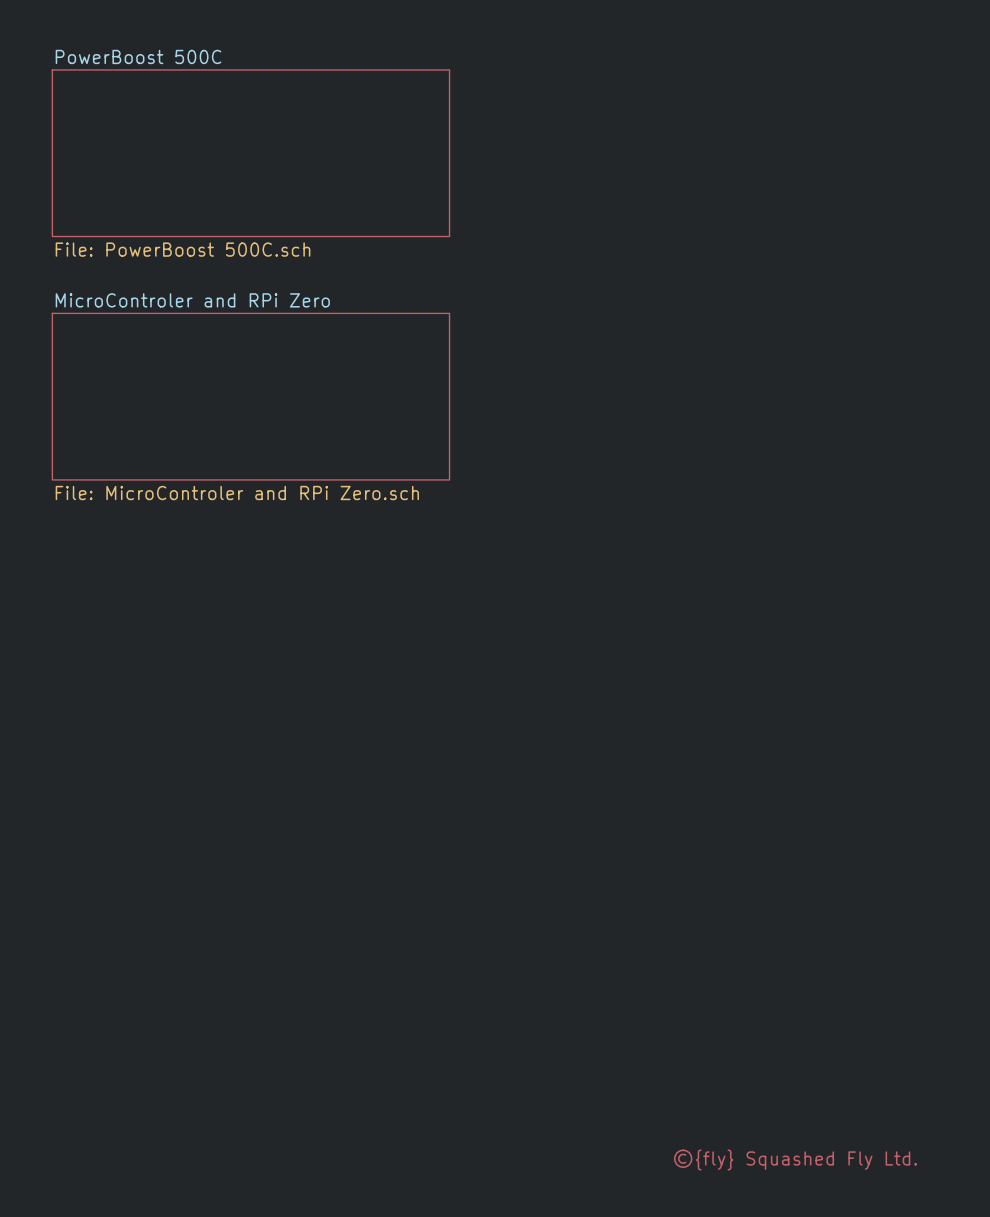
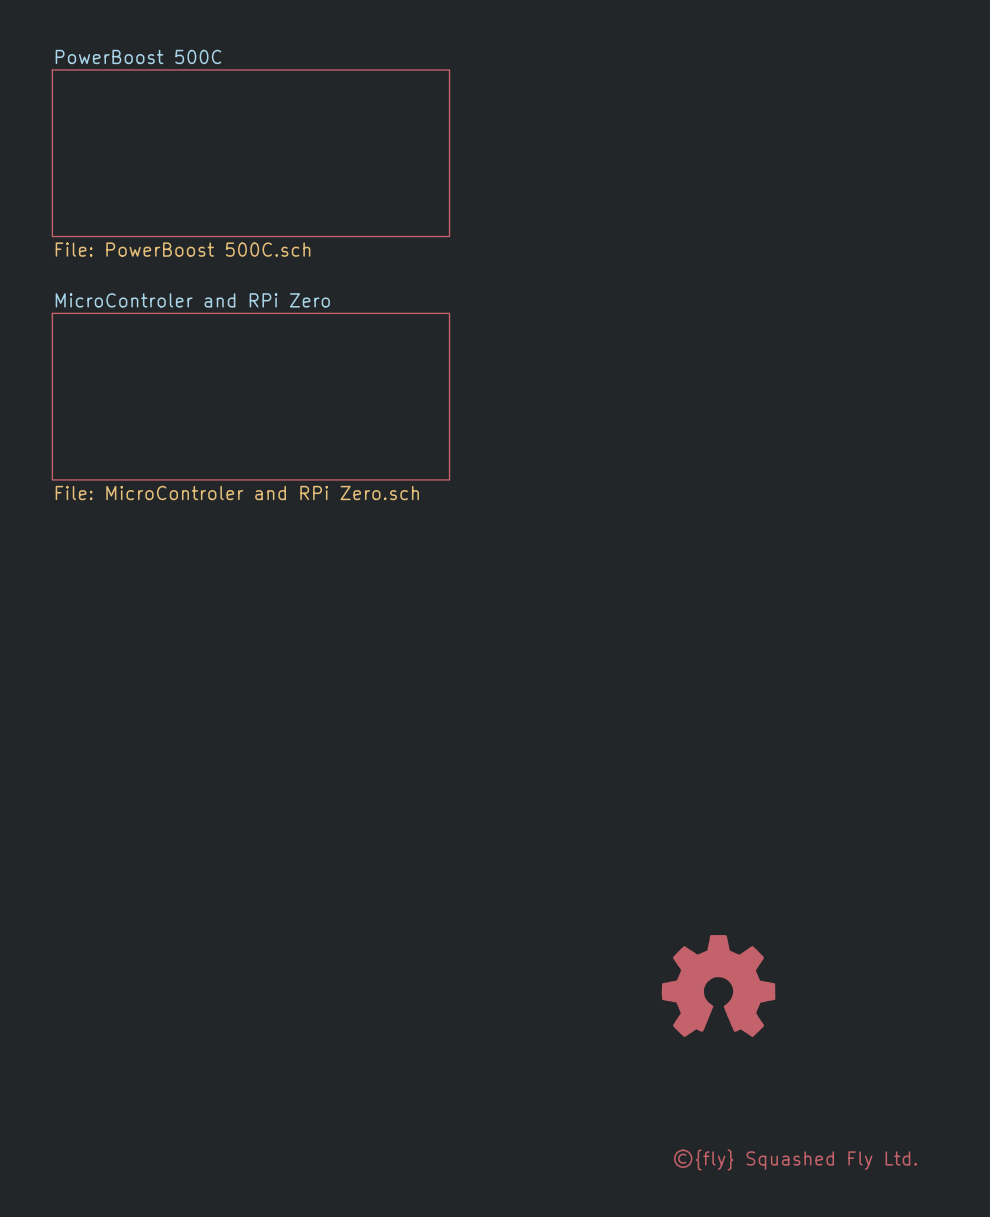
power symbol: none -> (718, 985)

